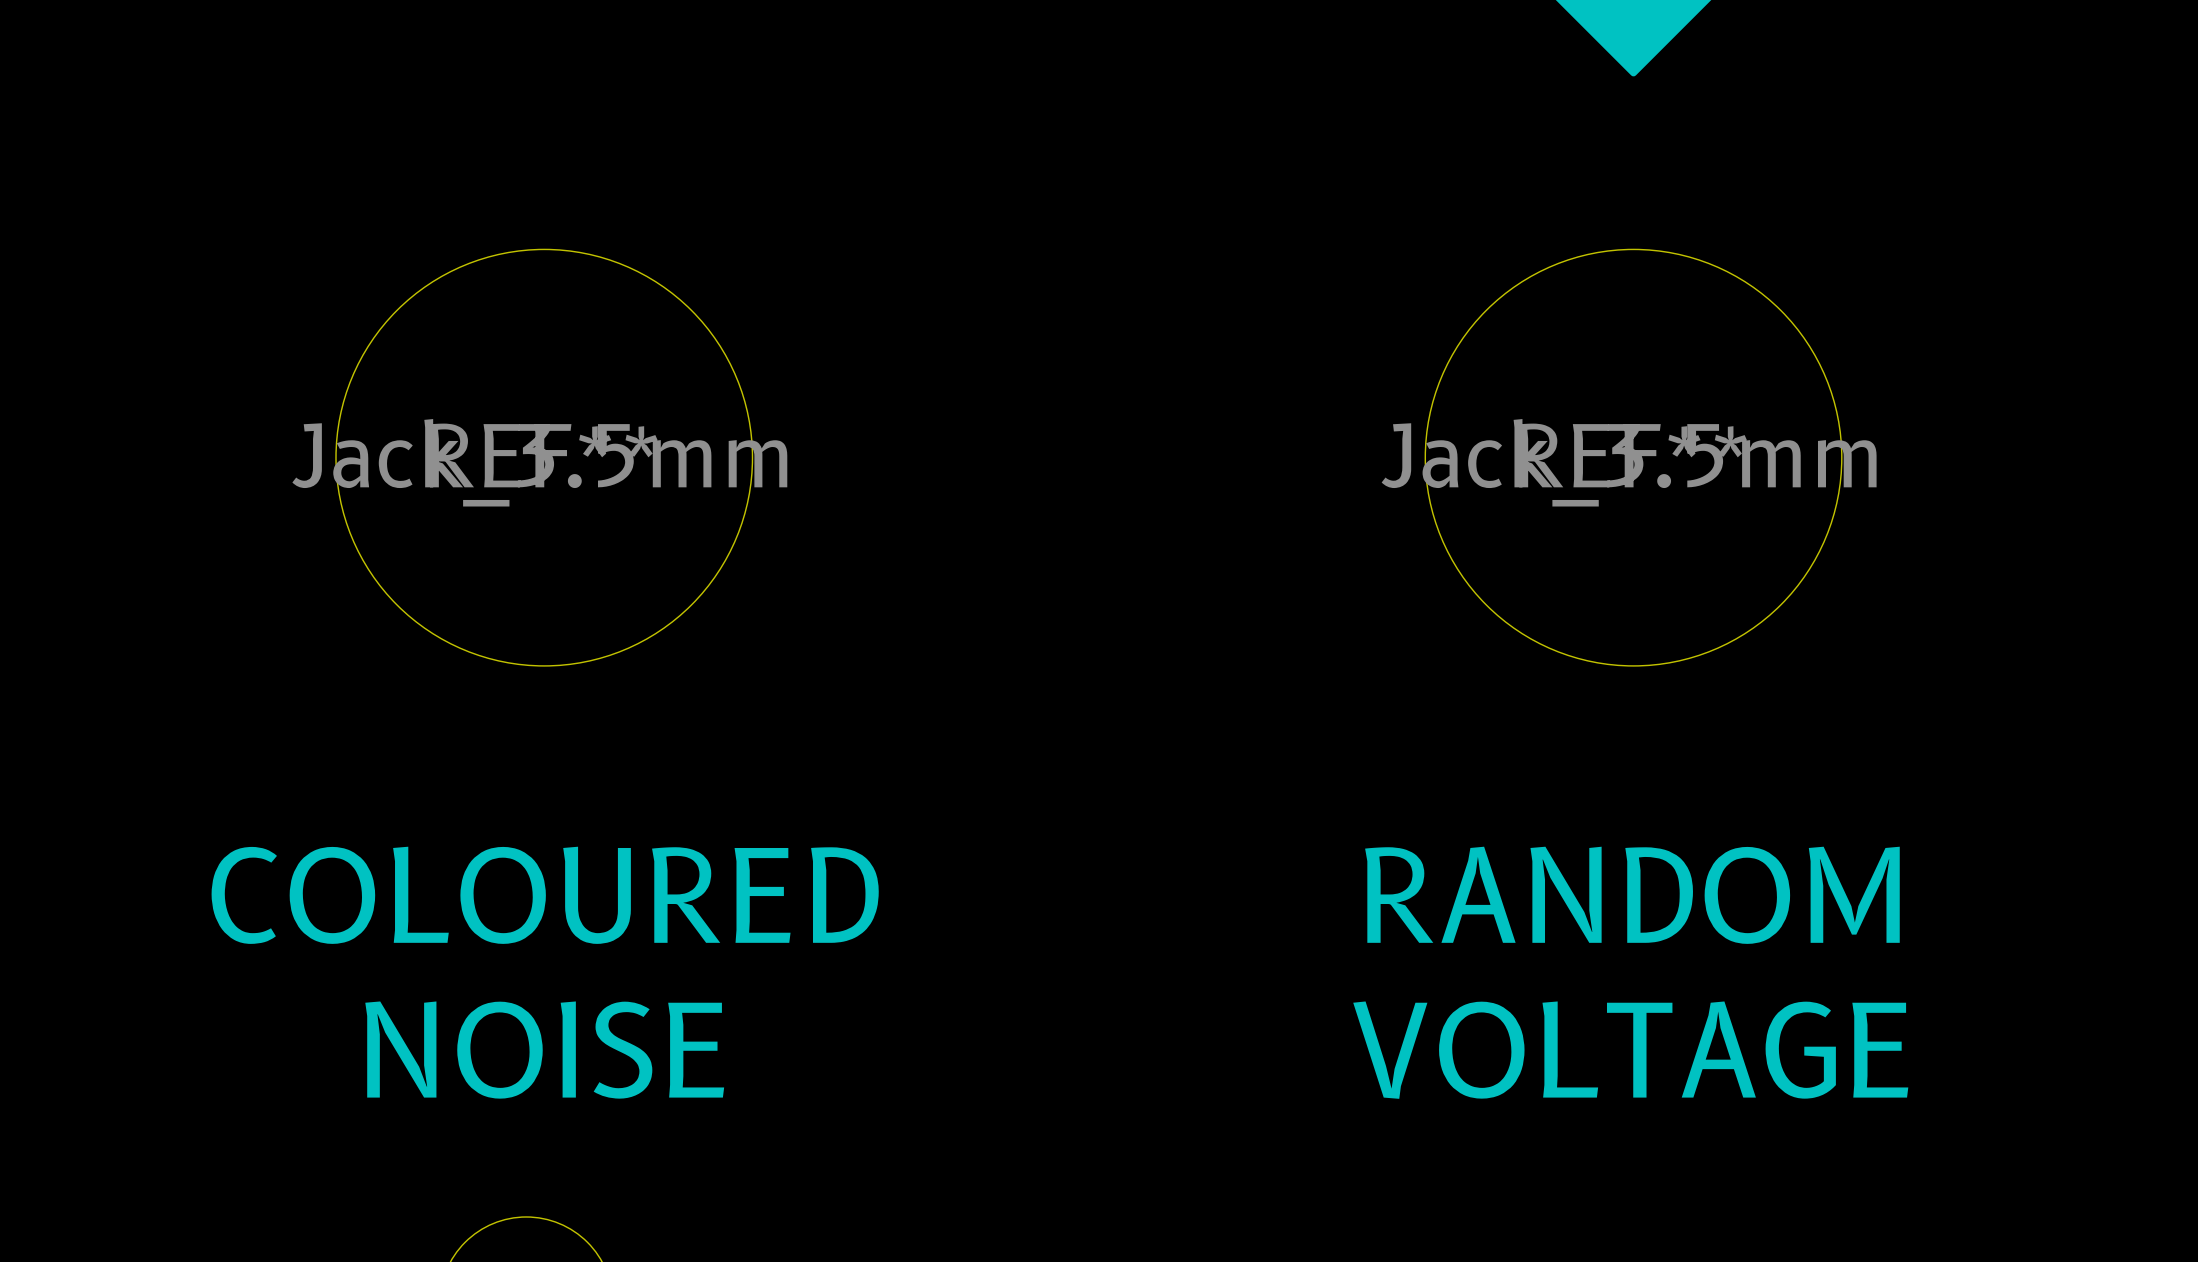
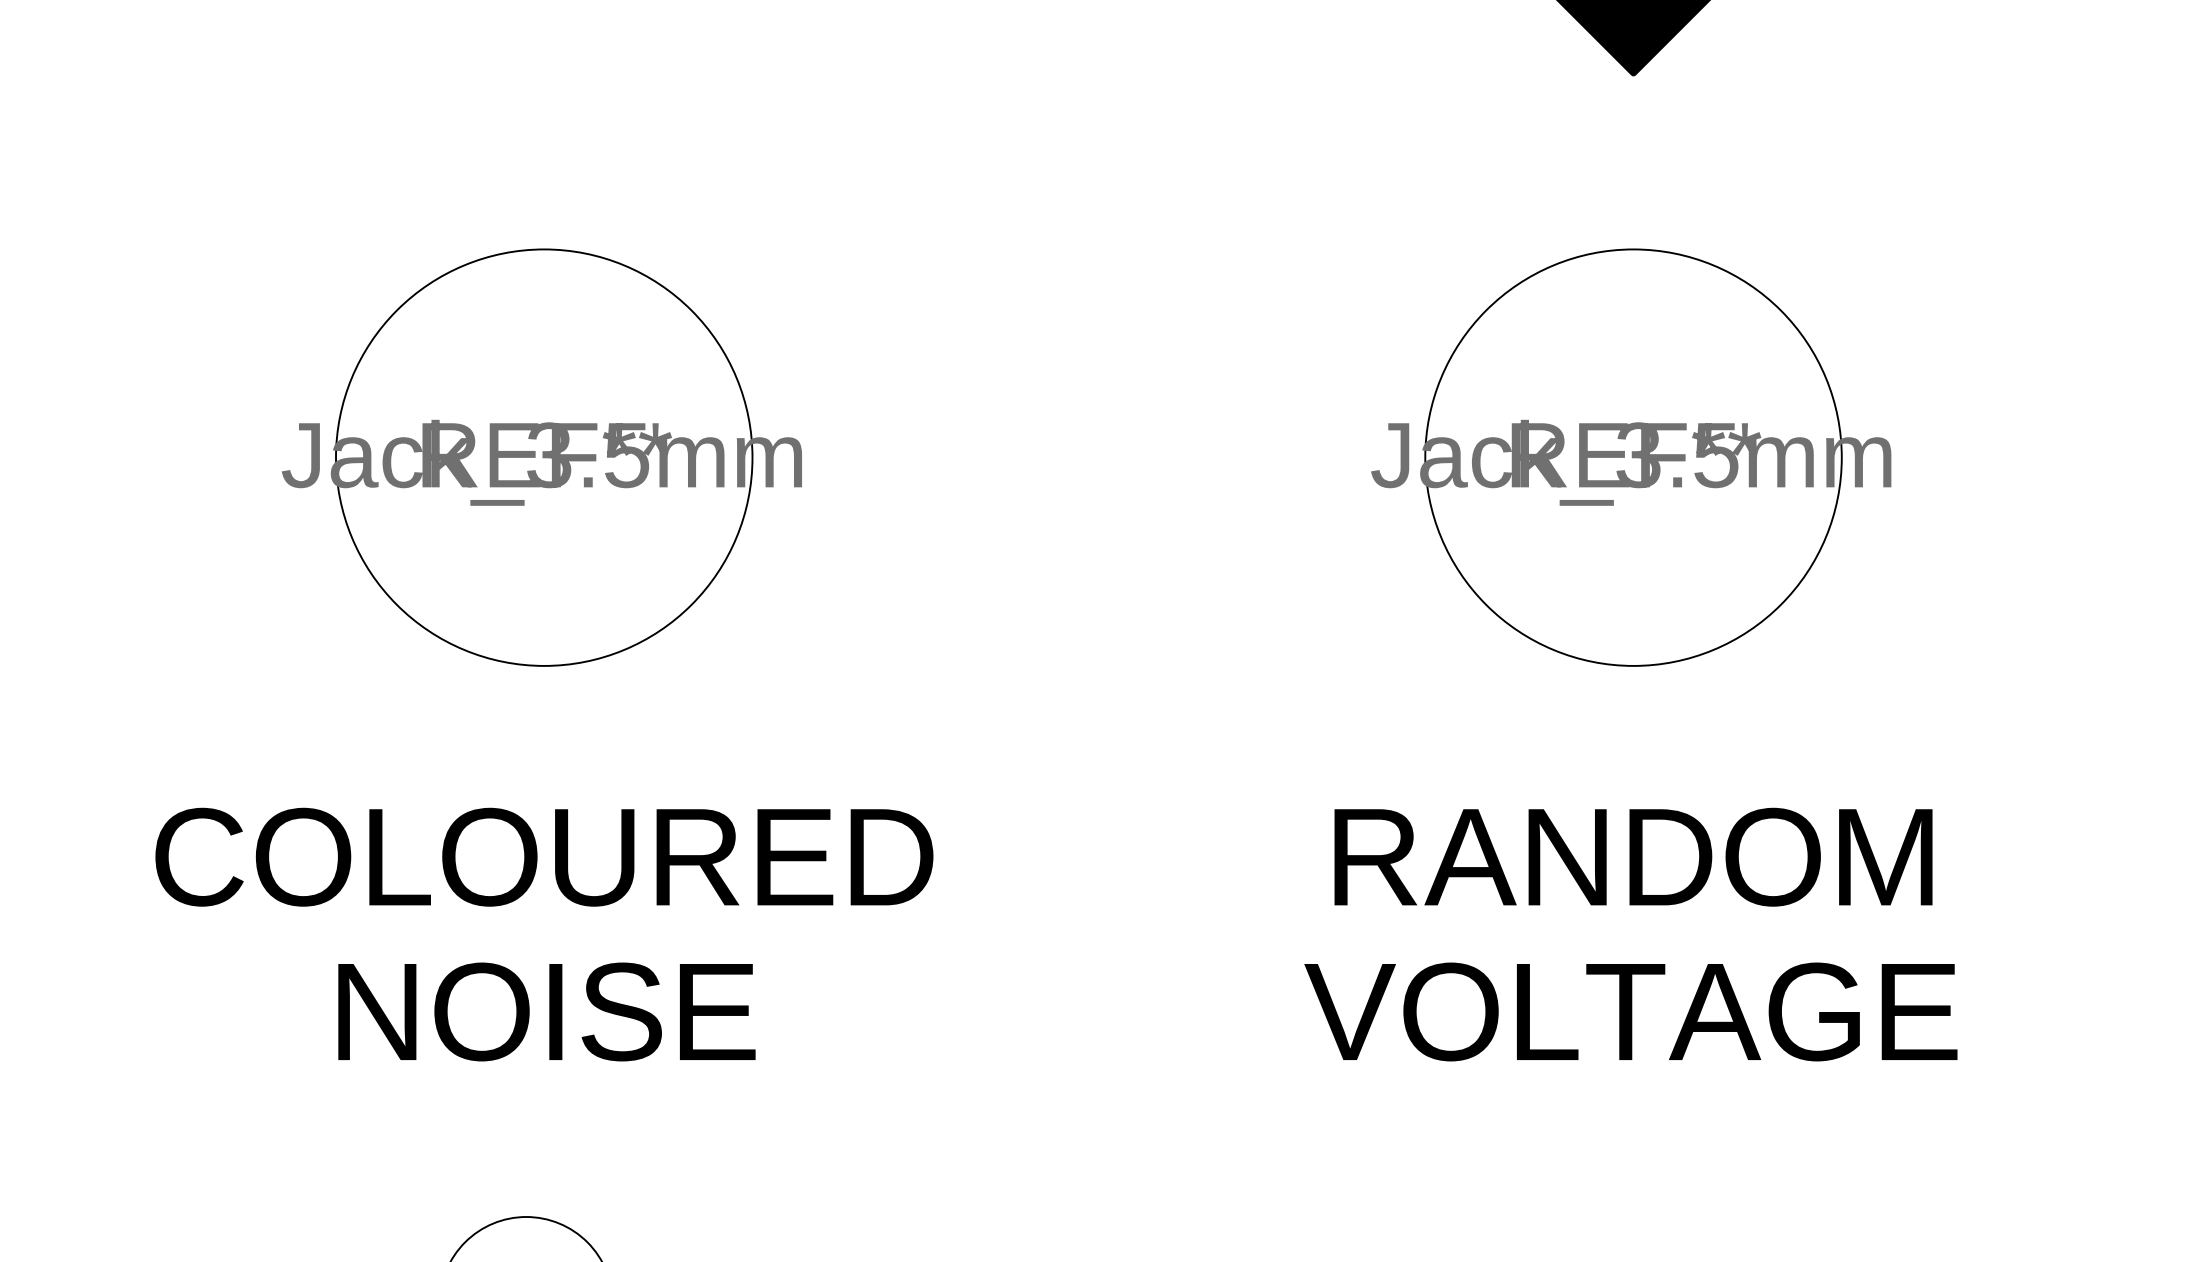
text position: COLOURED (545, 895) -> COLOURED (544, 857)
text position: RANDOM (1632, 895) -> RANDOM (1633, 857)
text position: NOISE (544, 1050) -> NOISE (546, 1012)
text position: VOLTAGE (1630, 1050) -> VOLTAGE (1630, 1012)

